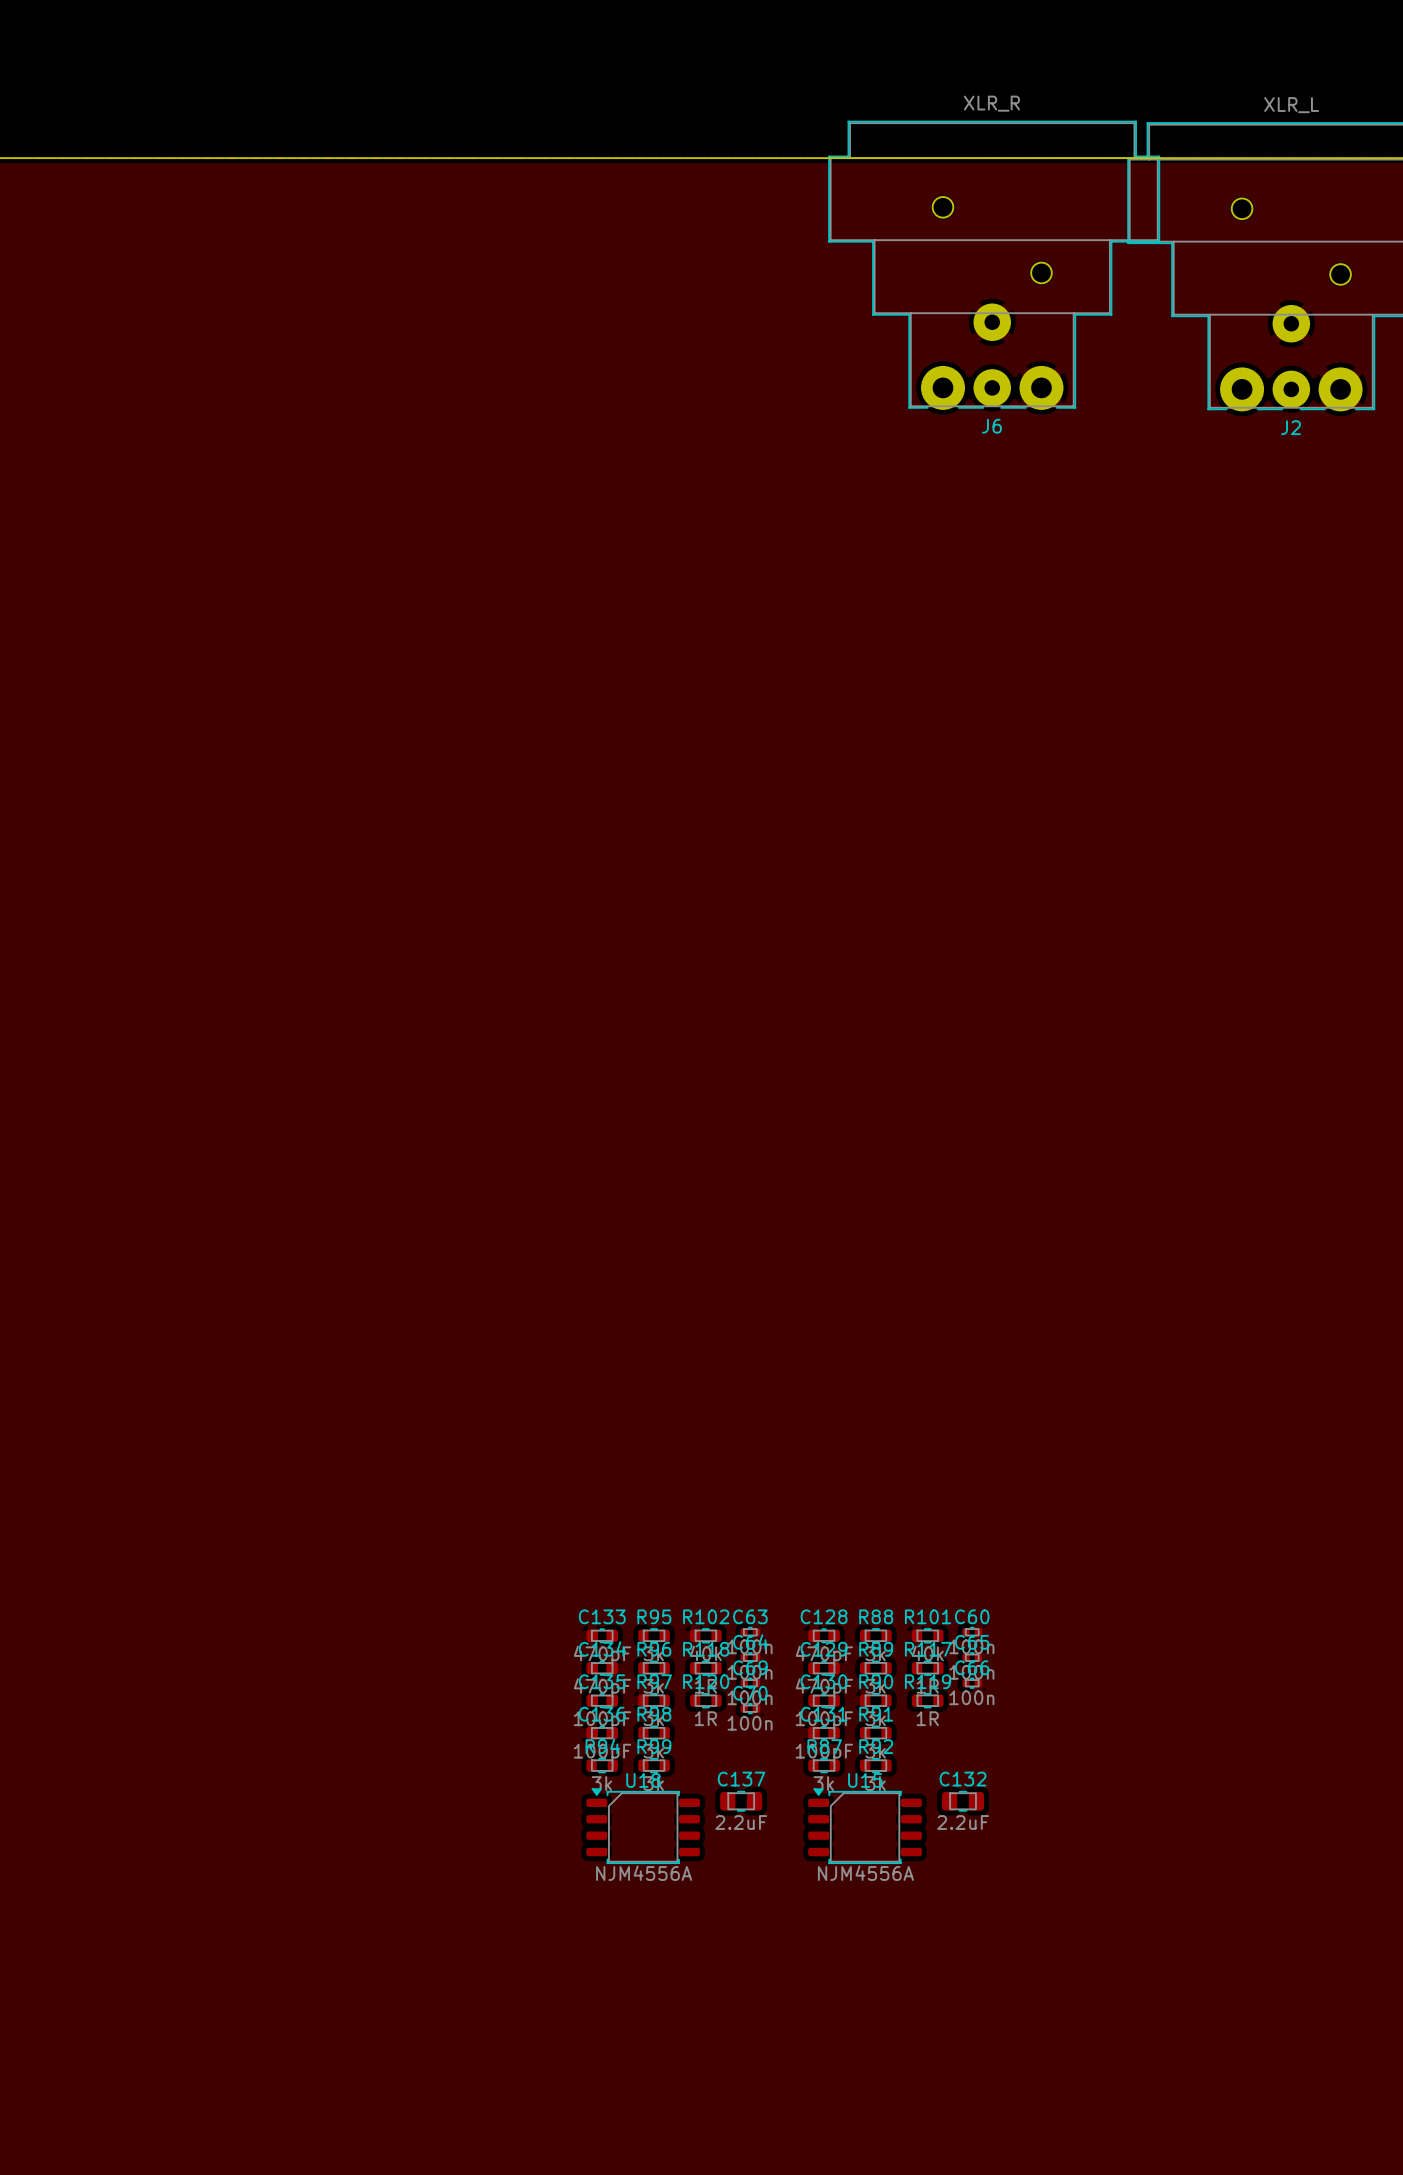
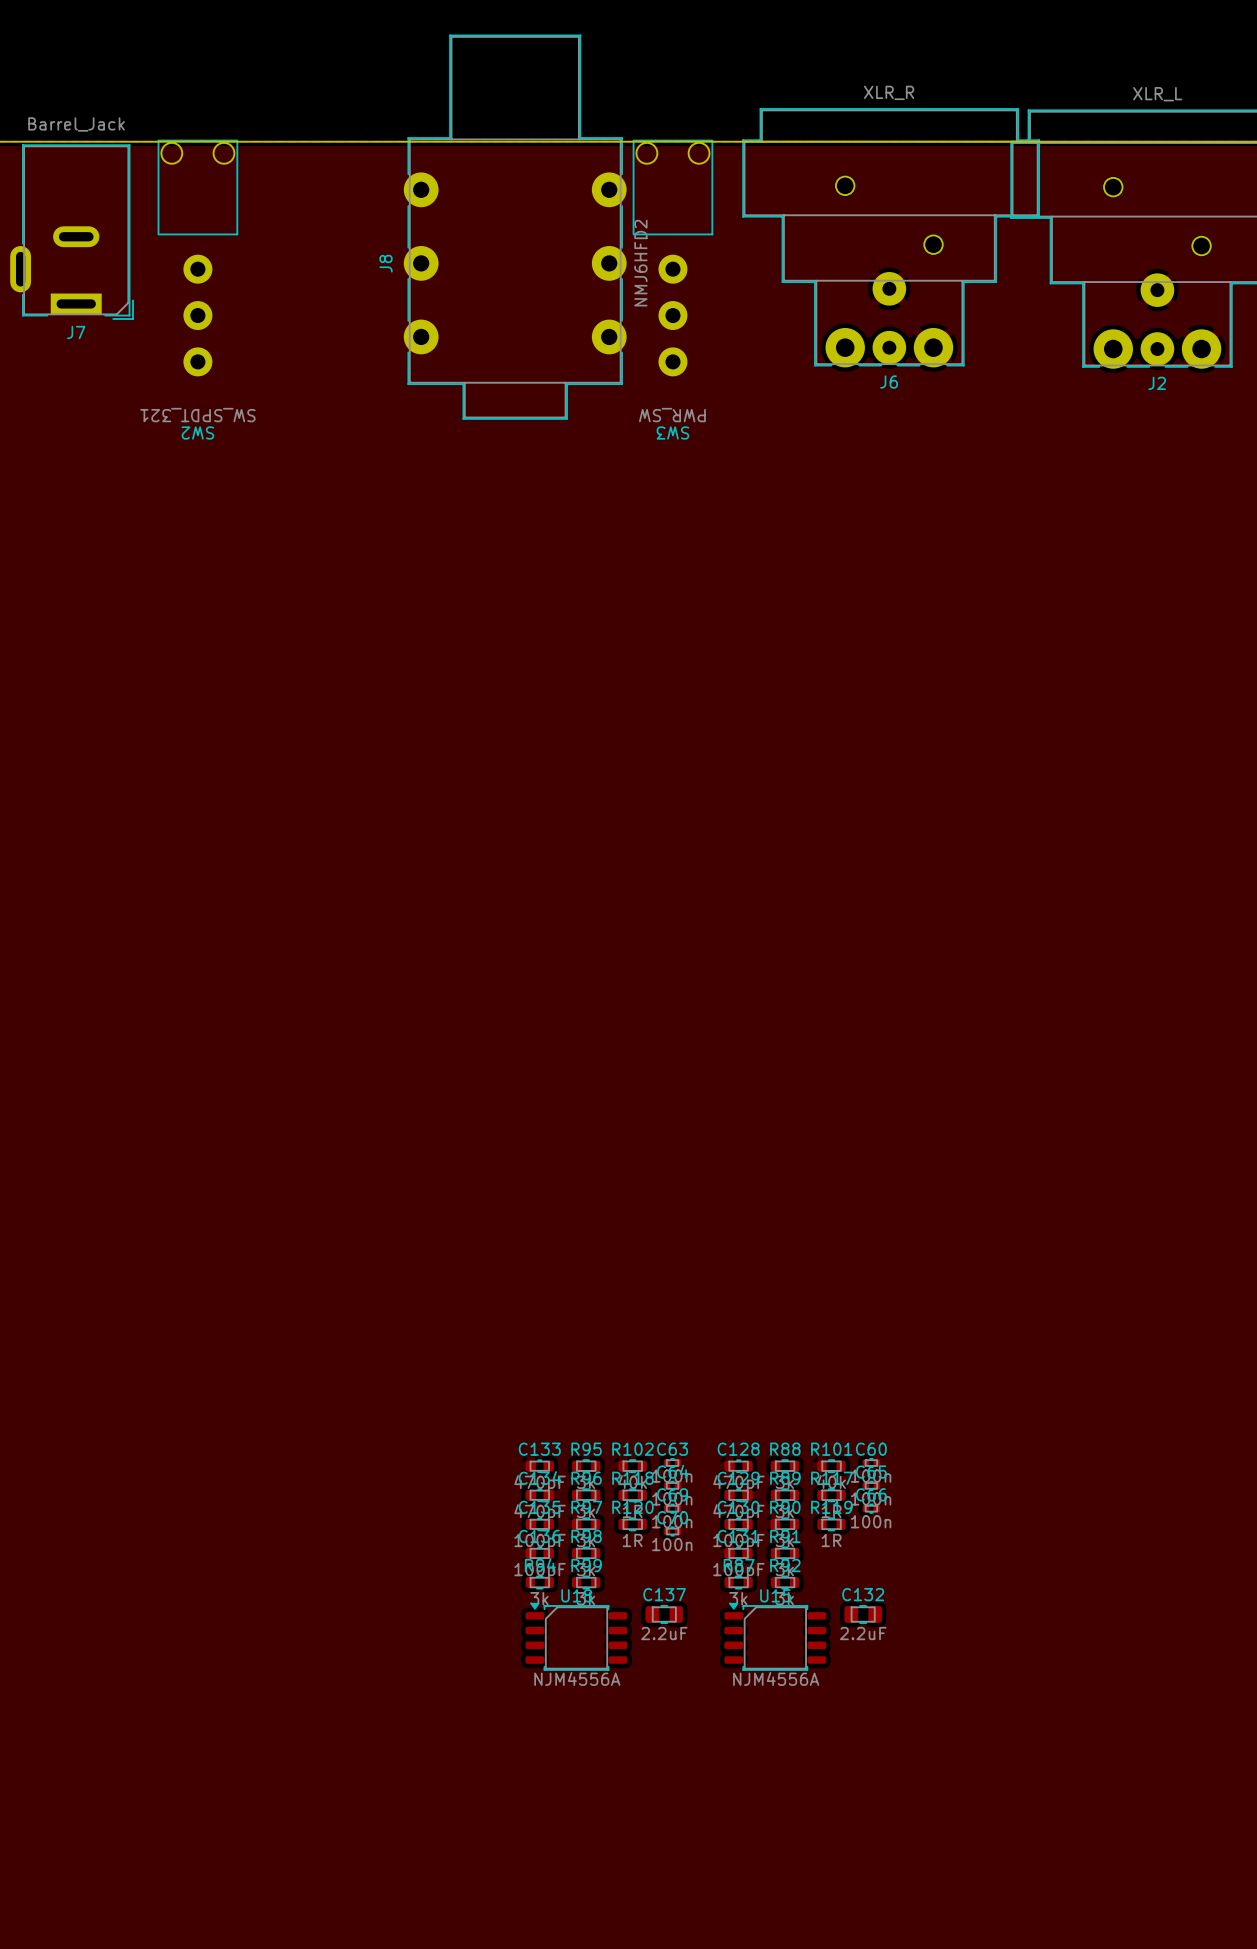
J8: none -> NMJ6HFD2 (515, 227)
J7: none -> Barrel_Jack (71, 232)
SW2: none -> SW_SPDT_321 (197, 258)
SW3: none -> PWR_SW (672, 258)

